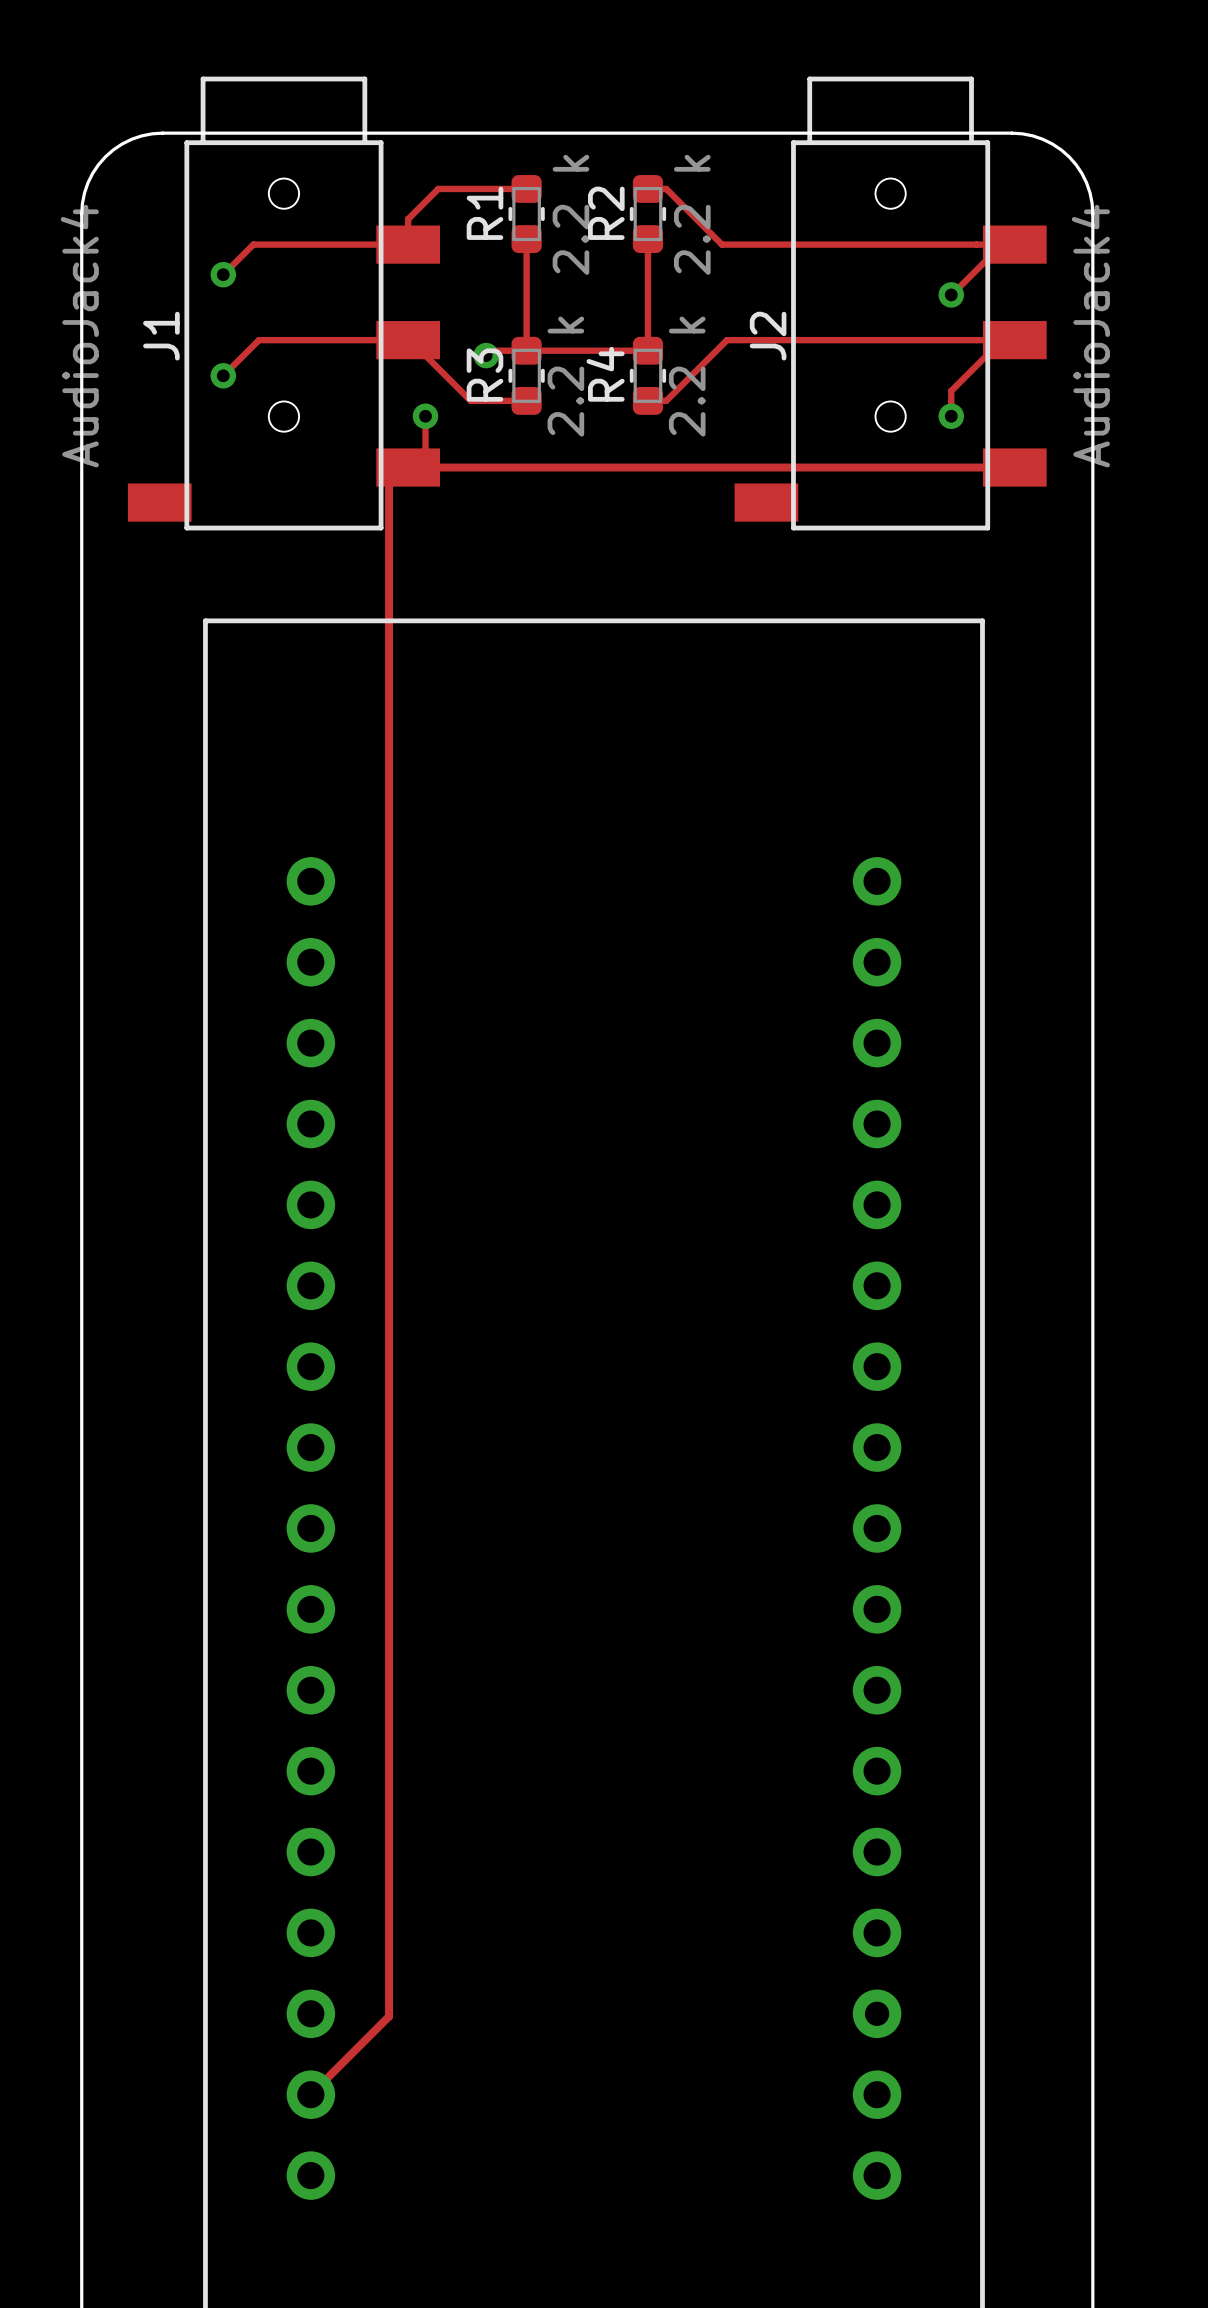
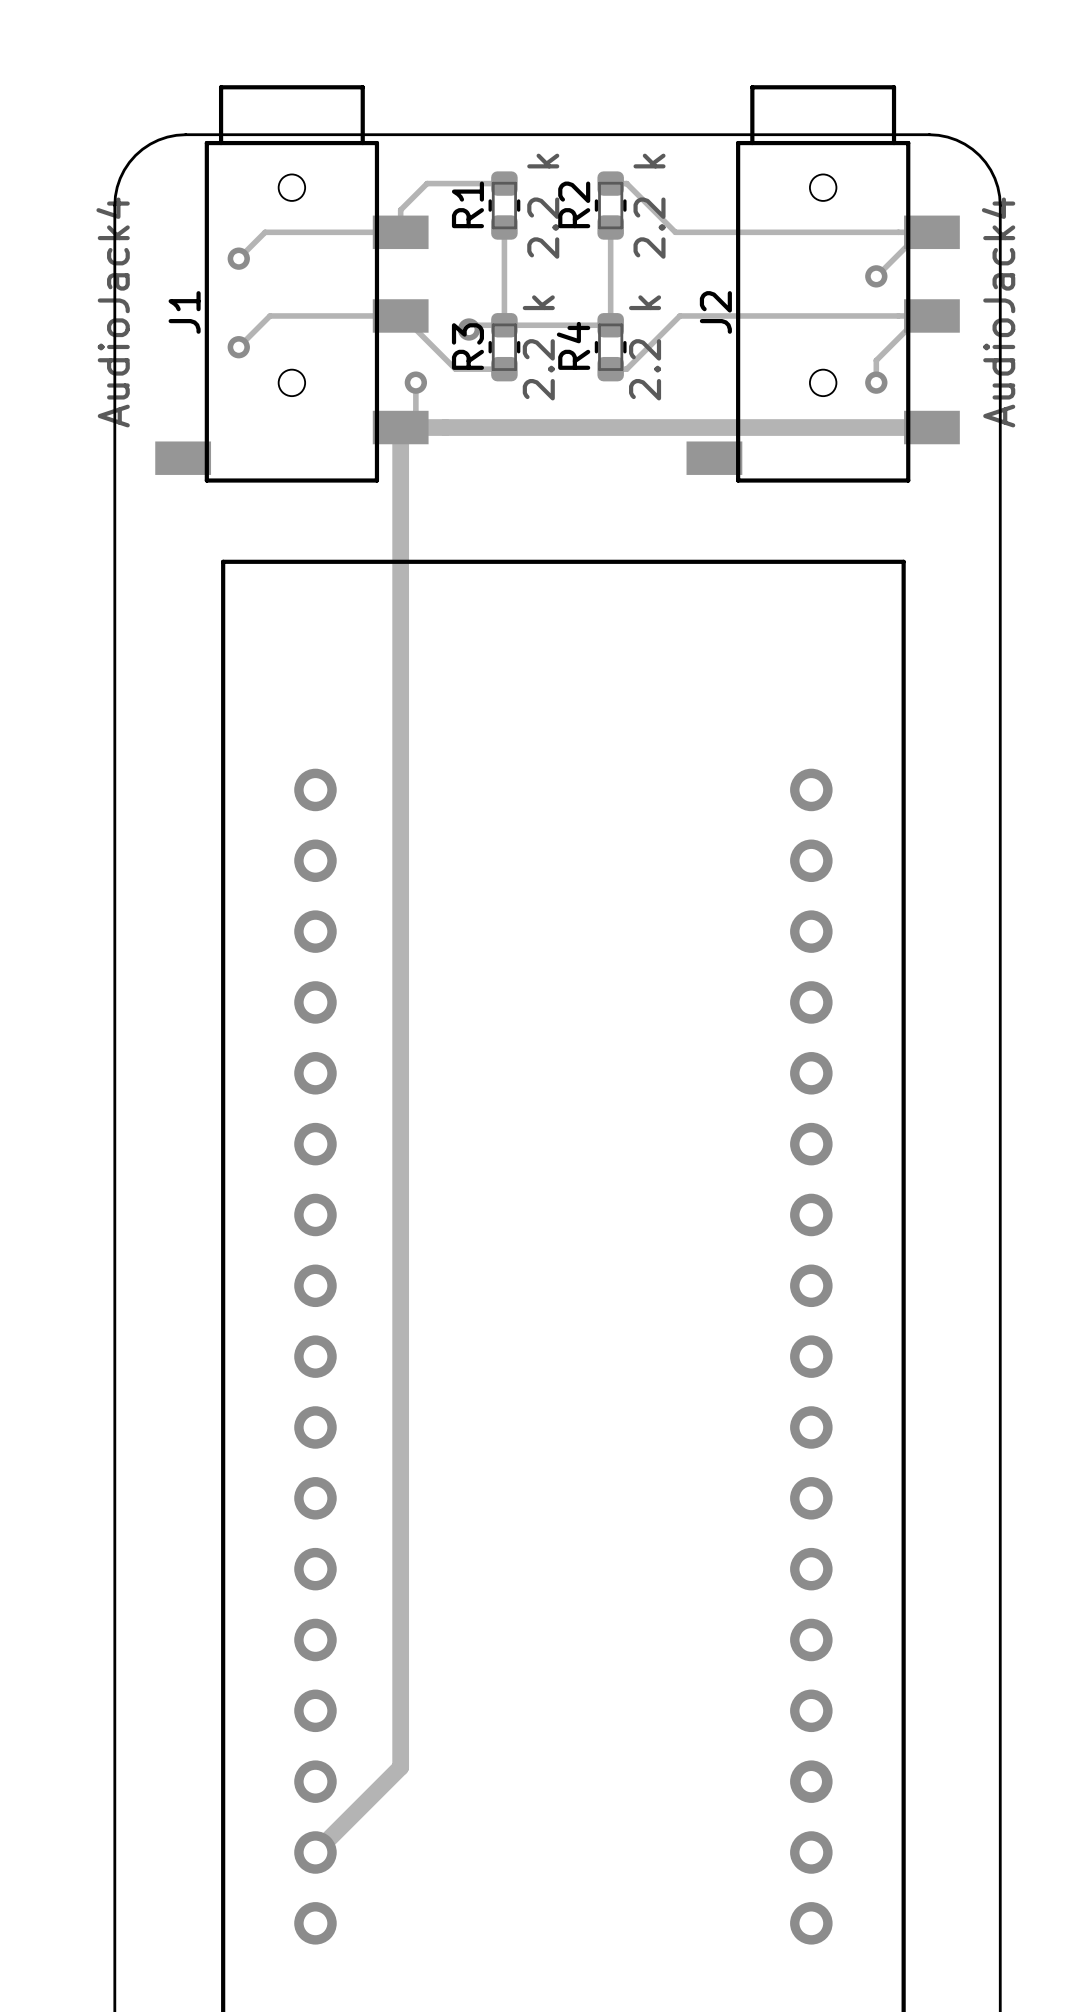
track: (408, 467) (389, 467) (389, 2016) -> (400, 427) (400, 1767) (383, 1784)
track width: thin (408, 467) (995, 467) -> thick (400, 427) (915, 427)
track width: thin (389, 2016) (310, 2094) -> thick (383, 1784) (315, 1852)

